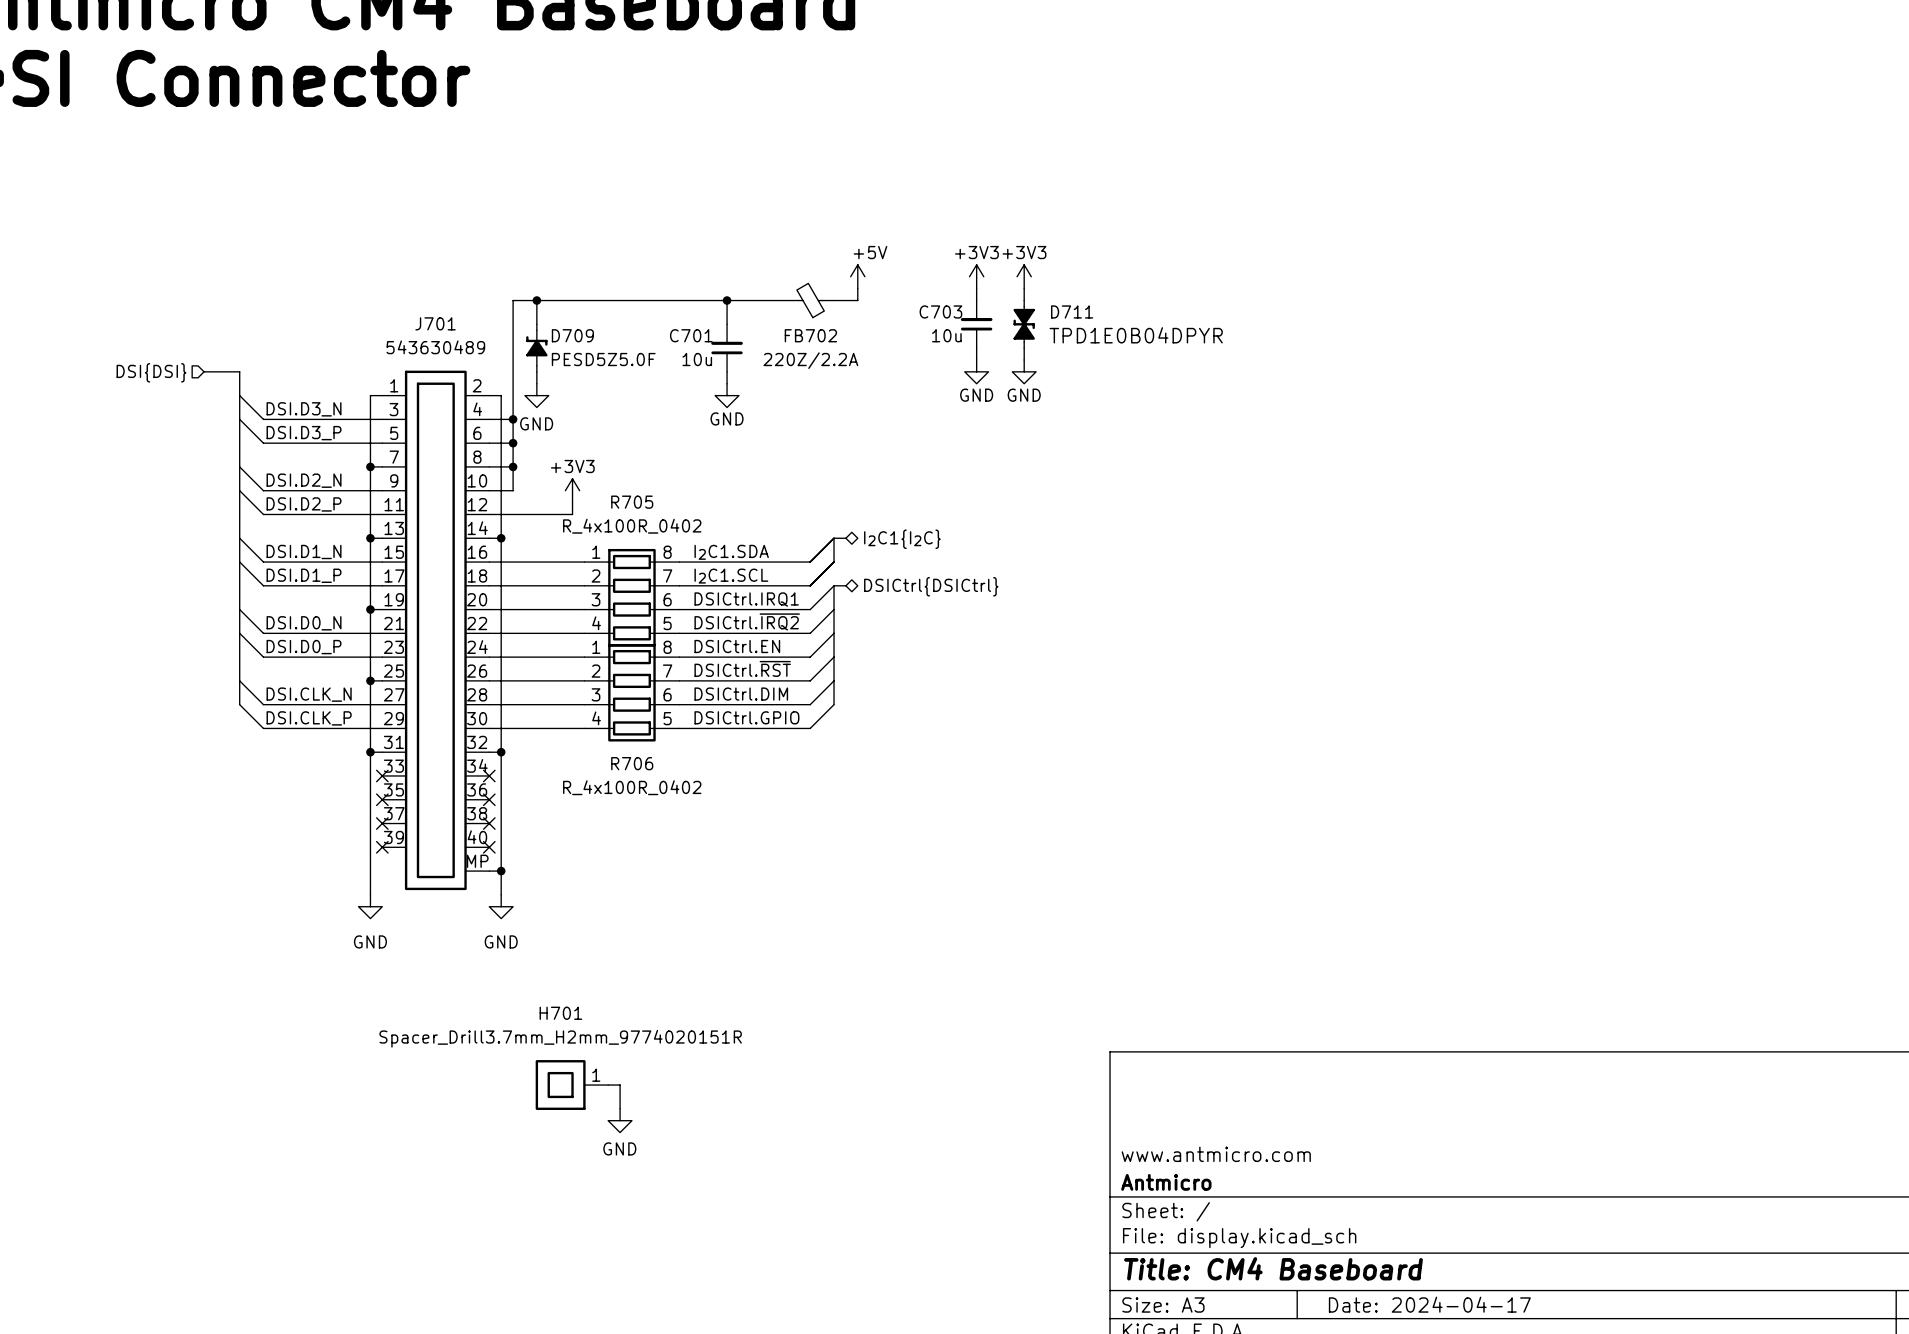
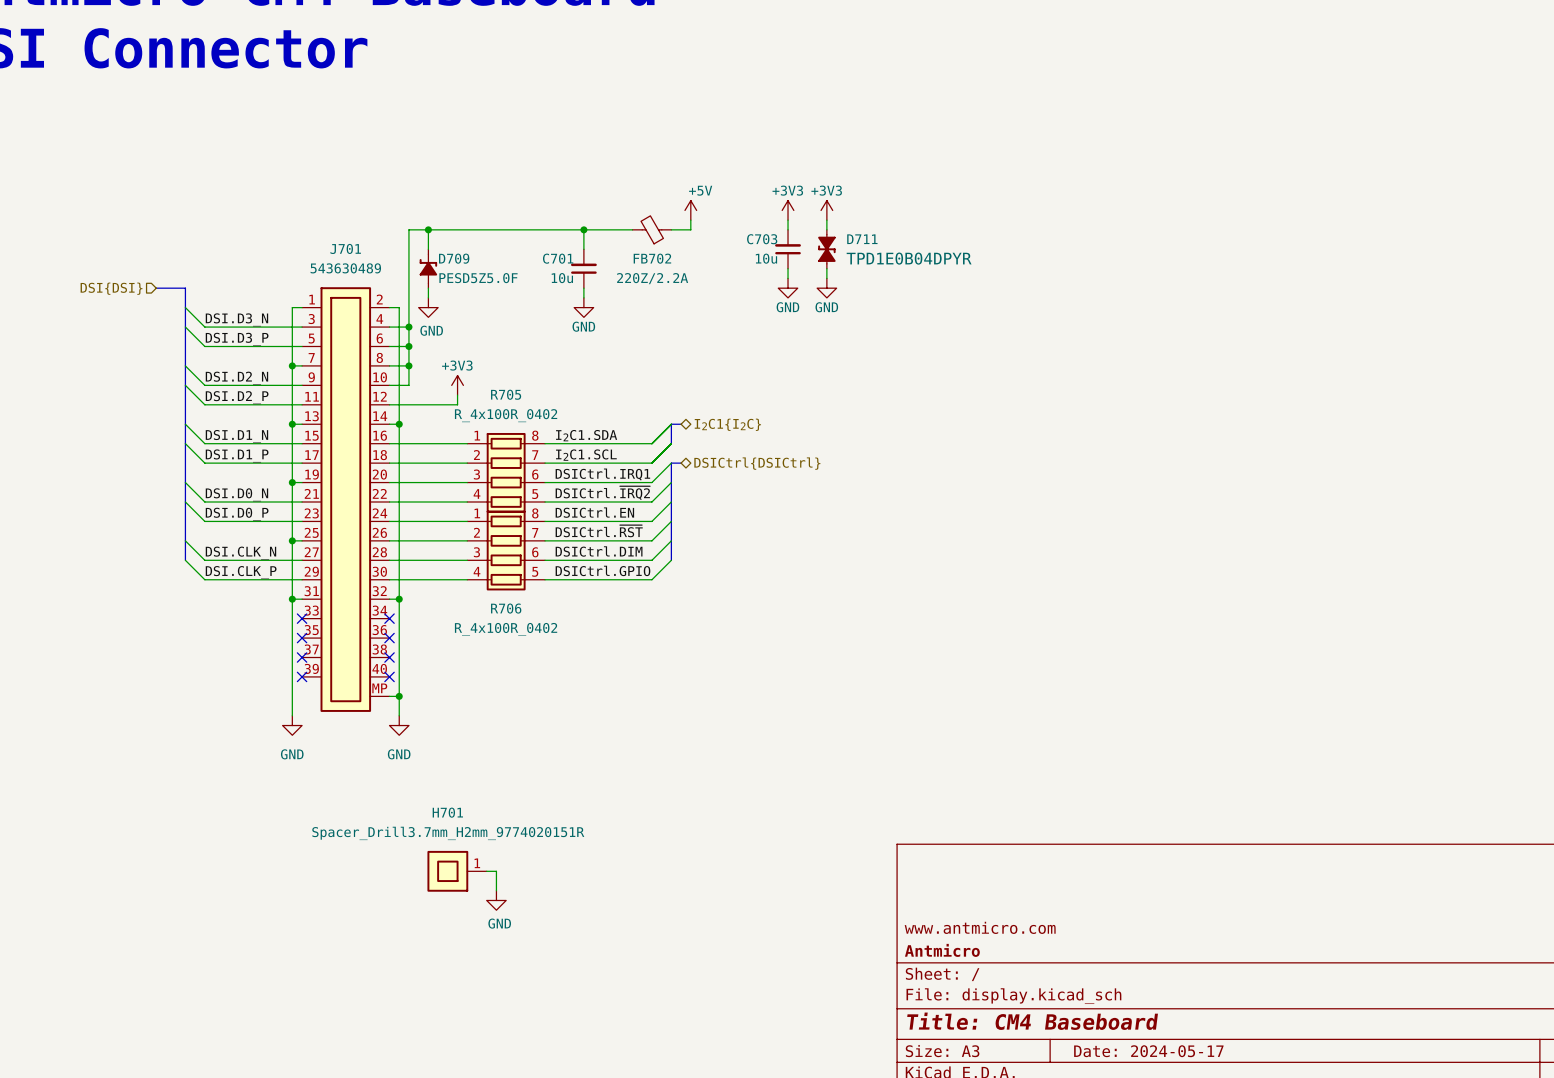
title block: Date: 2024-04-17 (1429, 1304) -> Date: 2024-05-17 (1148, 1051)

